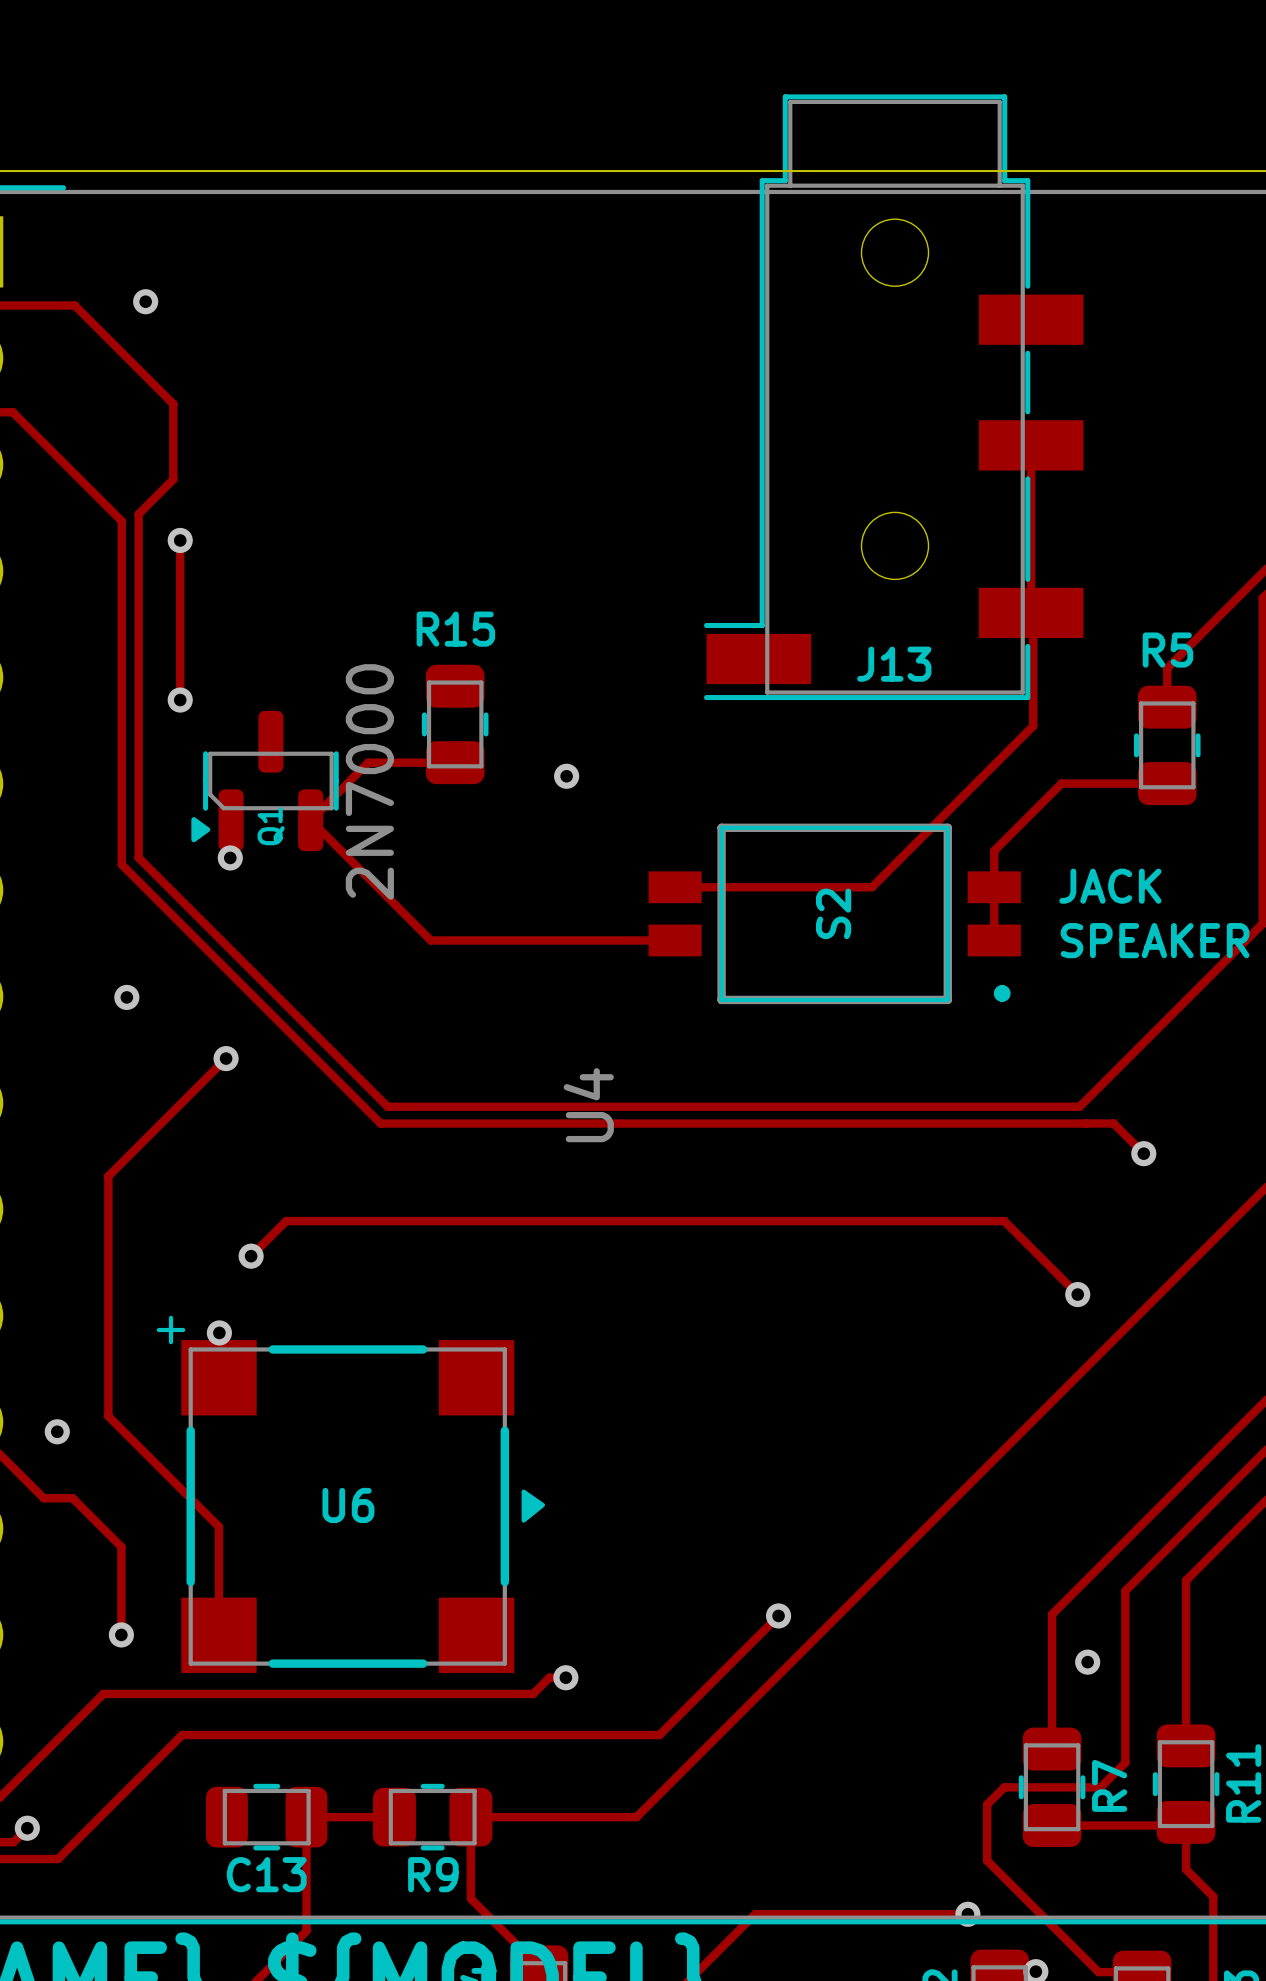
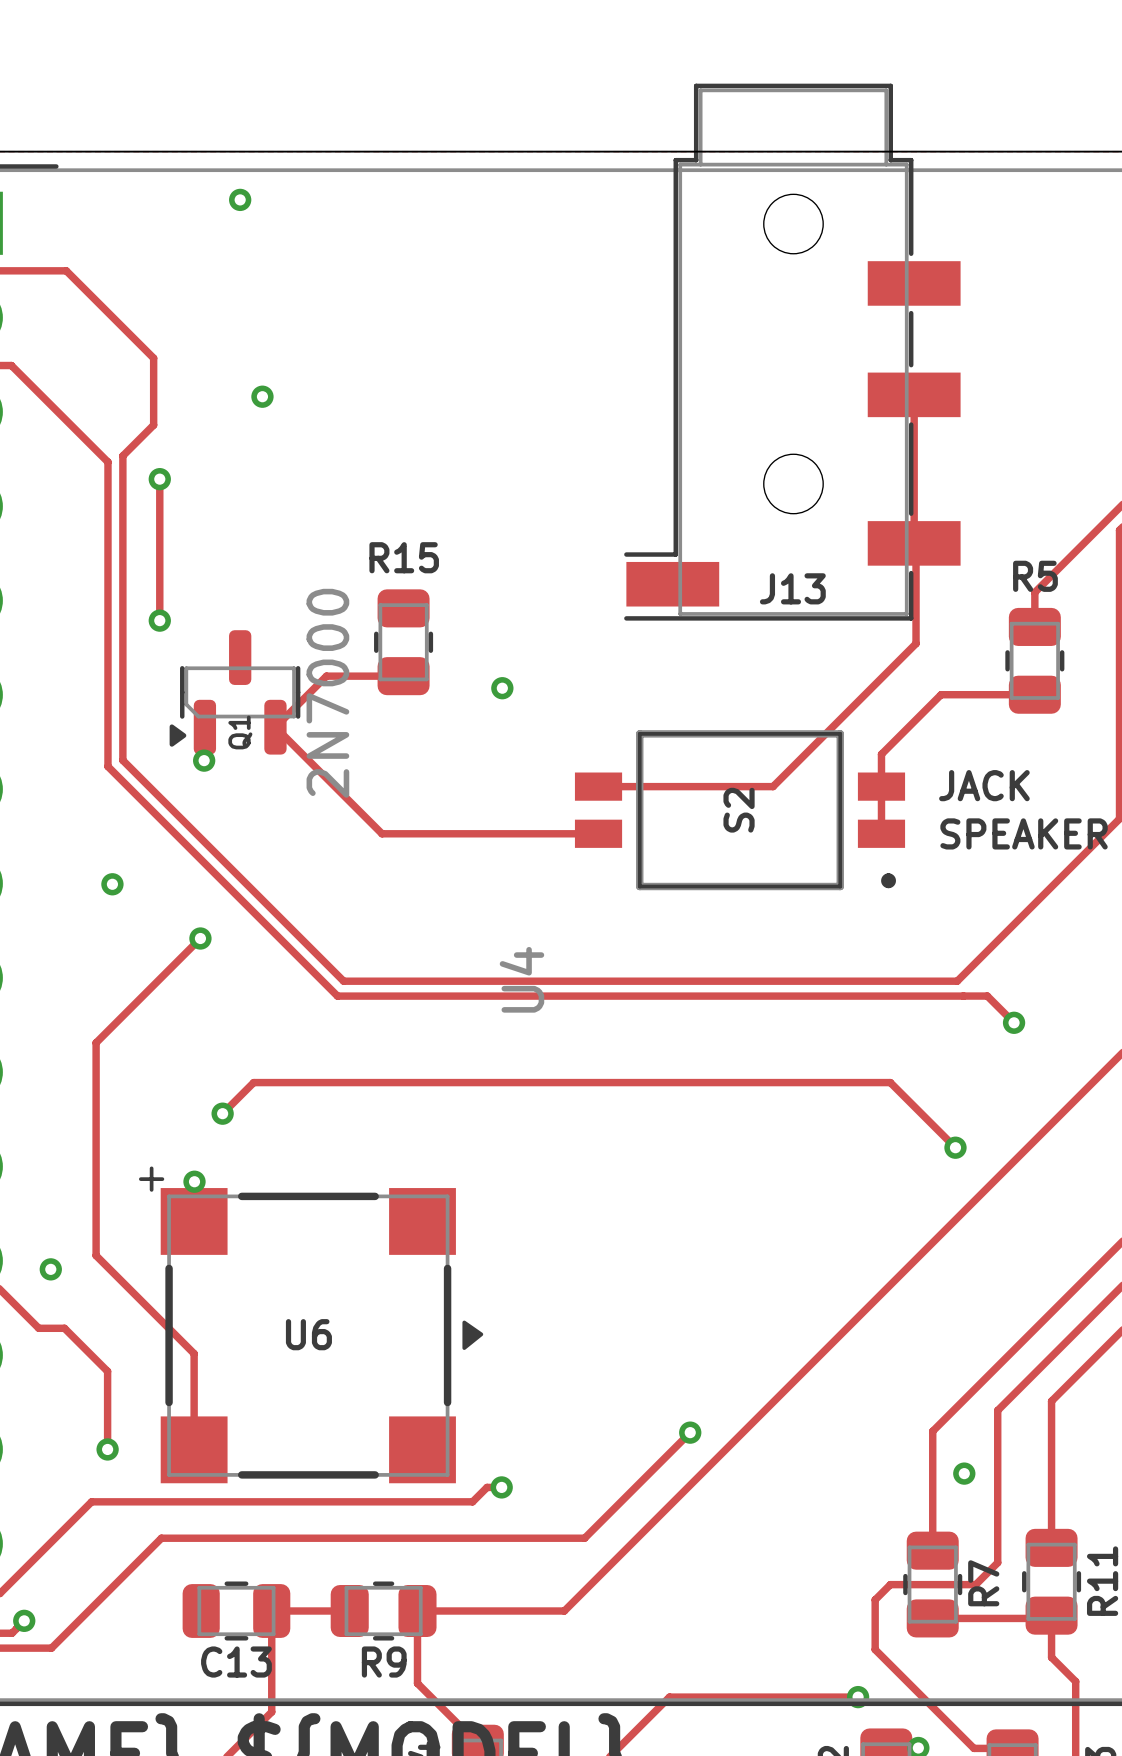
via: none -> (240, 199)
via: (145, 301) -> none
via: none -> (262, 396)

